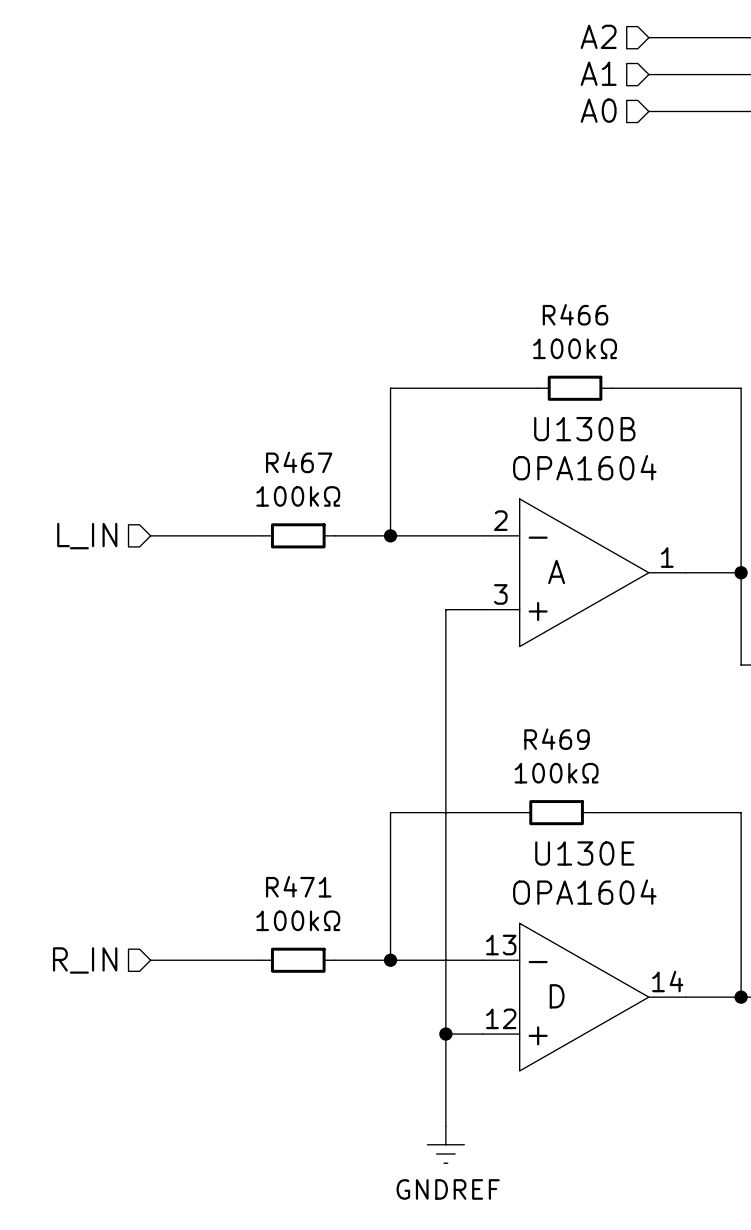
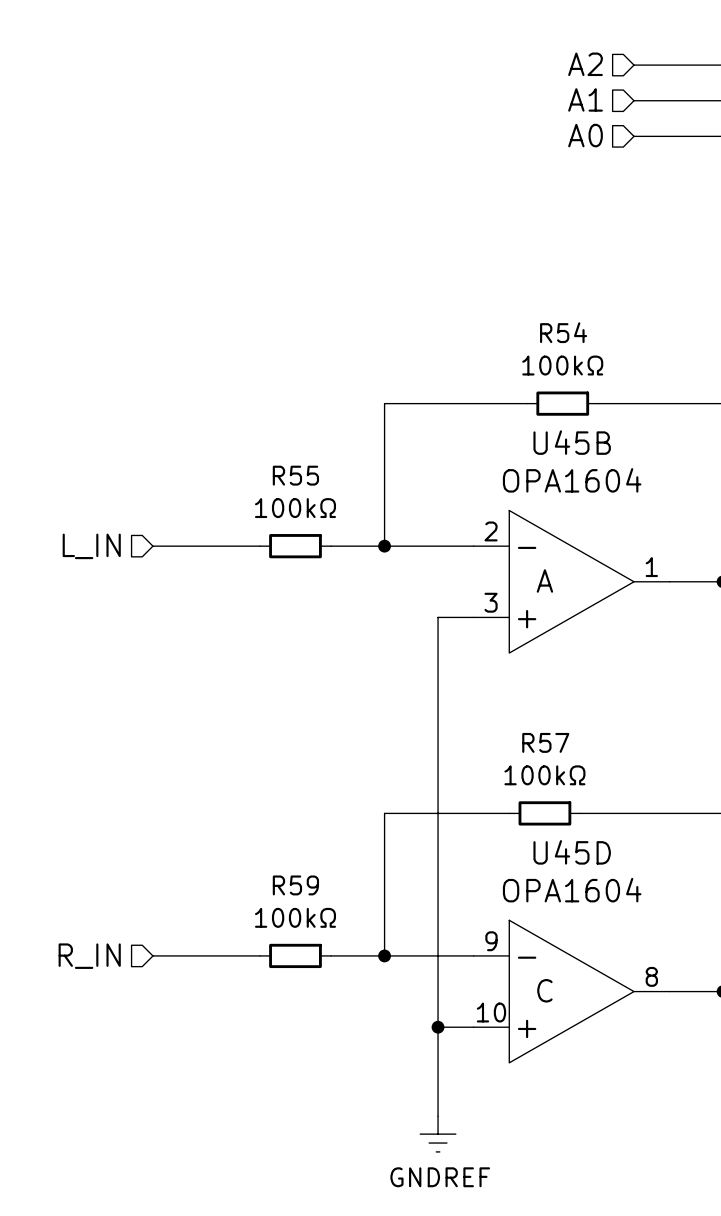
R466 name: R466 (575, 314) -> R54 (563, 332)
U130B name: U130B (584, 429) -> U45B (572, 442)
R467 name: R467 (299, 462) -> R55 (295, 475)
R469 name: R469 (557, 739) -> R57 (545, 742)
U130E name: U130E (584, 853) -> U45D (572, 852)
R471 name: R471 (298, 886) -> R59 (295, 885)
U130E pin number: 13 (501, 945) -> 9 (491, 941)
U130E pin number: 14 (667, 981) -> 8 (651, 976)
U130E text: D (557, 996) -> C (544, 990)
U130E pin number: 12 (501, 1018) -> 10 (491, 1012)

